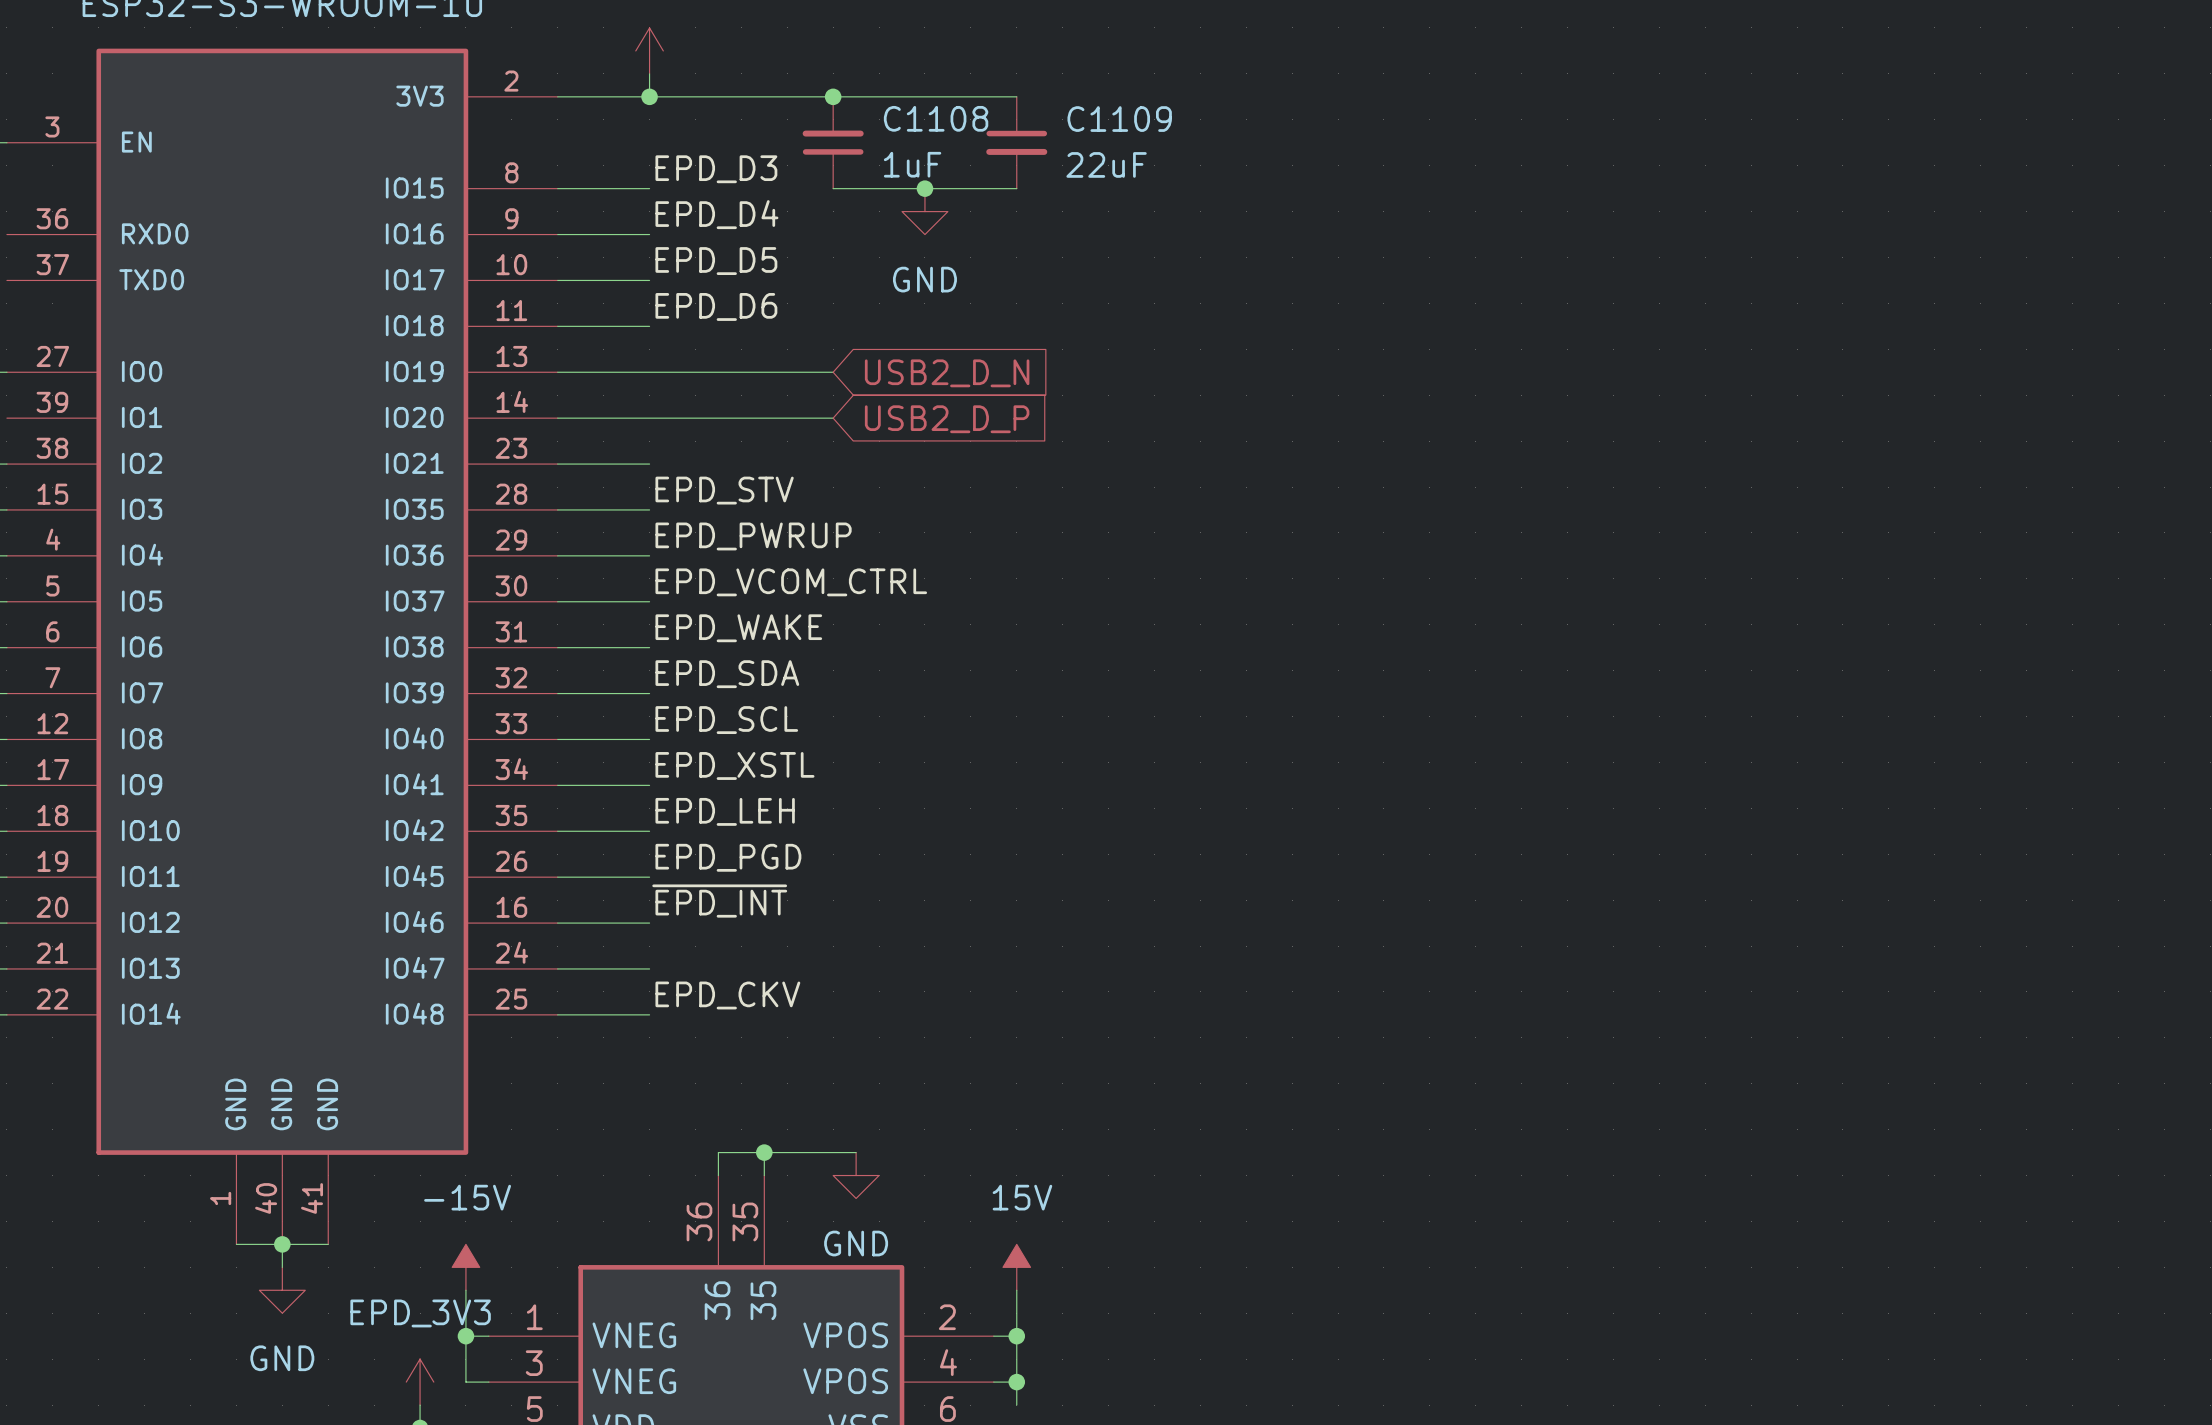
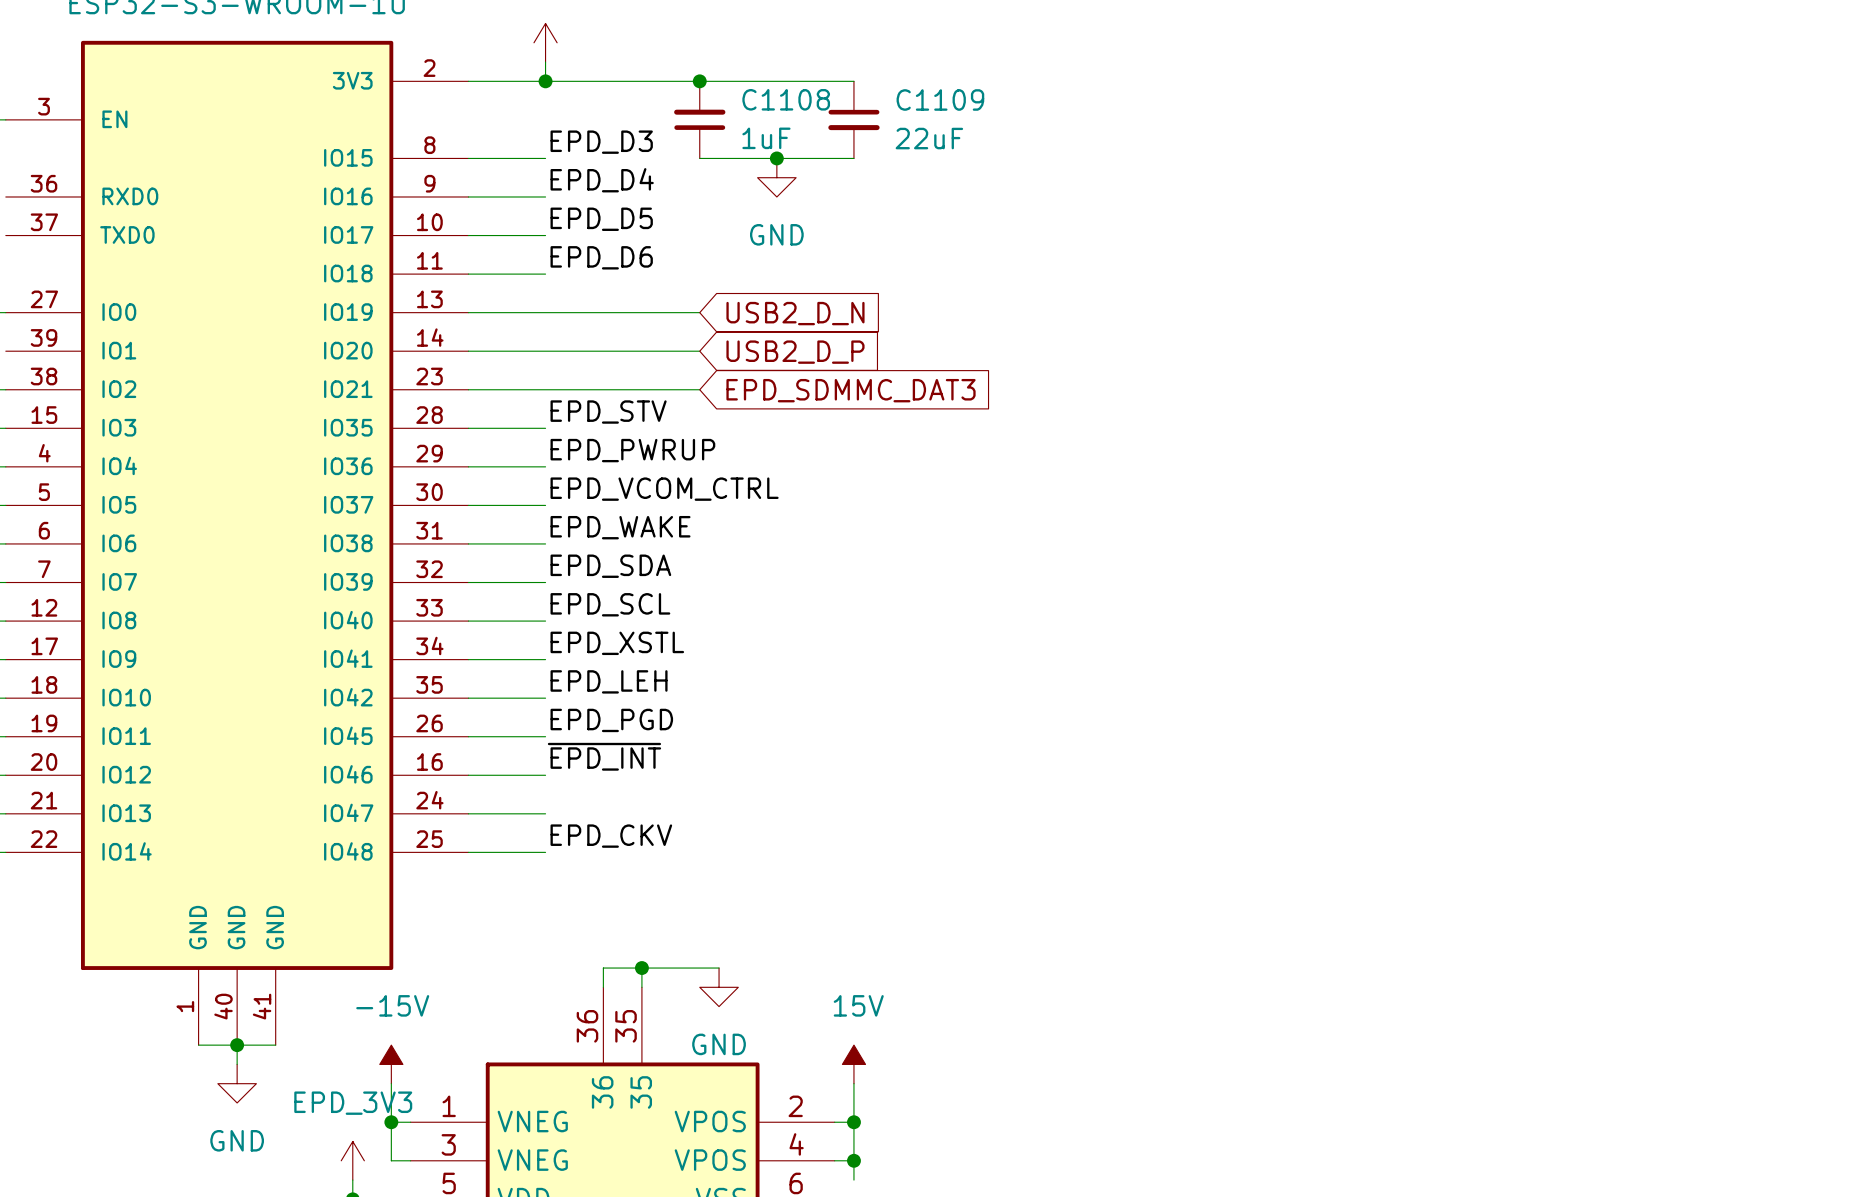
wire: none -> (545, 389) (699, 389)
global label: none -> EPD_SDMMC_DAT3 (851, 390)

